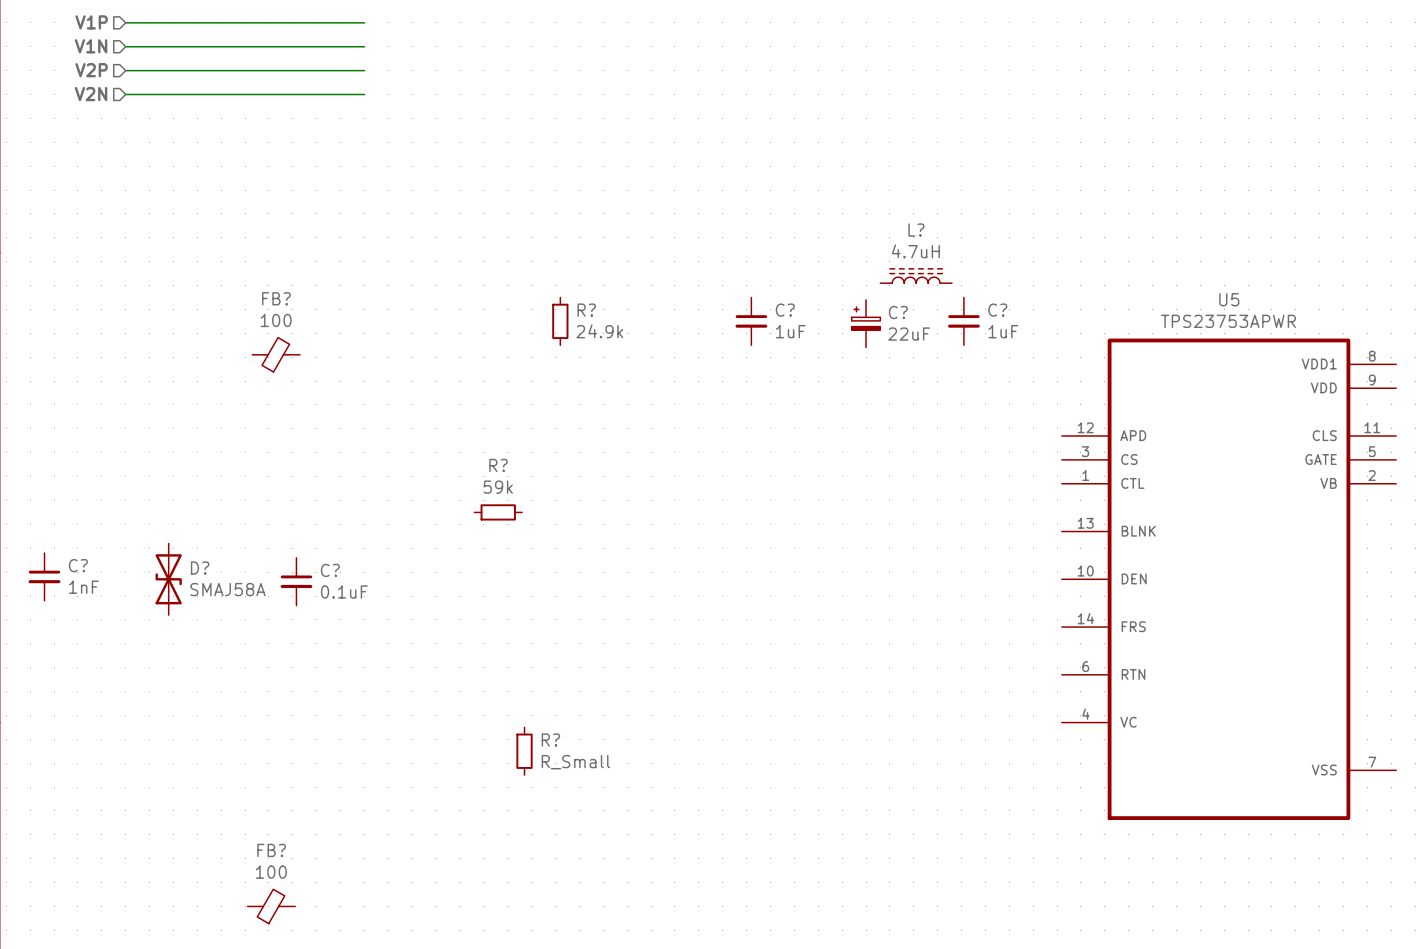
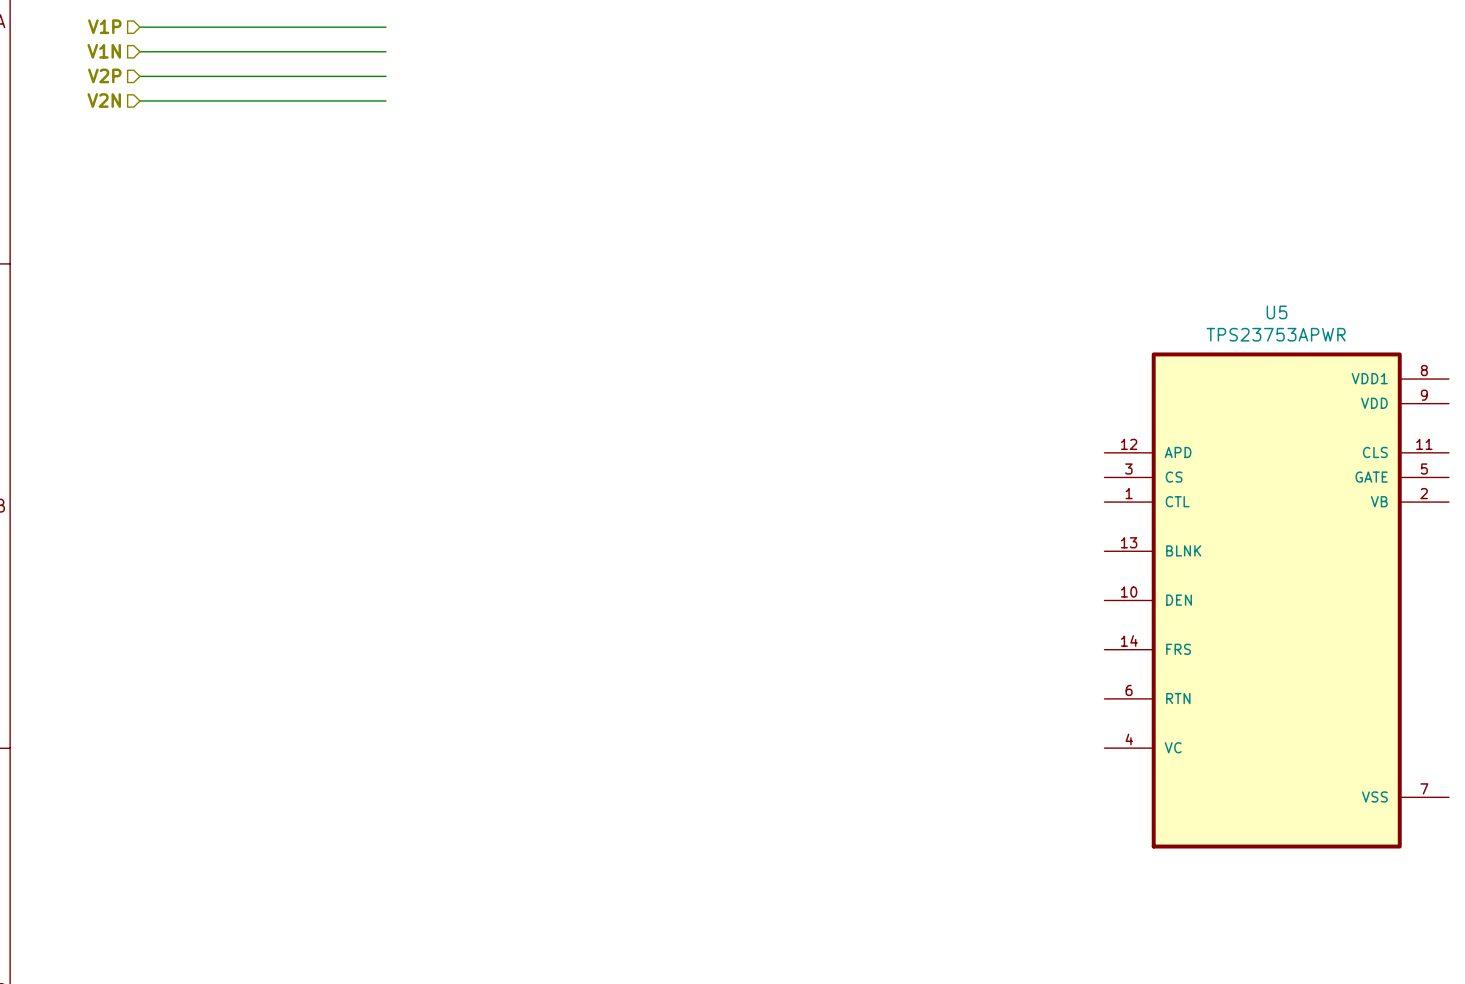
L?: 4.7uH (916, 276) -> none
R?: 24.9k (560, 321) -> none
C?: 1uF (751, 321) -> none
C?: 1uF (963, 321) -> none
C?: 22uF (866, 323) -> none
FB?: 100 (276, 354) -> none
R?: 59k (498, 512) -> none
C?: 1nF (44, 576) -> none
D?: SMAJ58A (168, 579) -> none
C?: 0.1uF (296, 581) -> none
R?: R_Small (524, 751) -> none
FB?: 100 (271, 906) -> none

